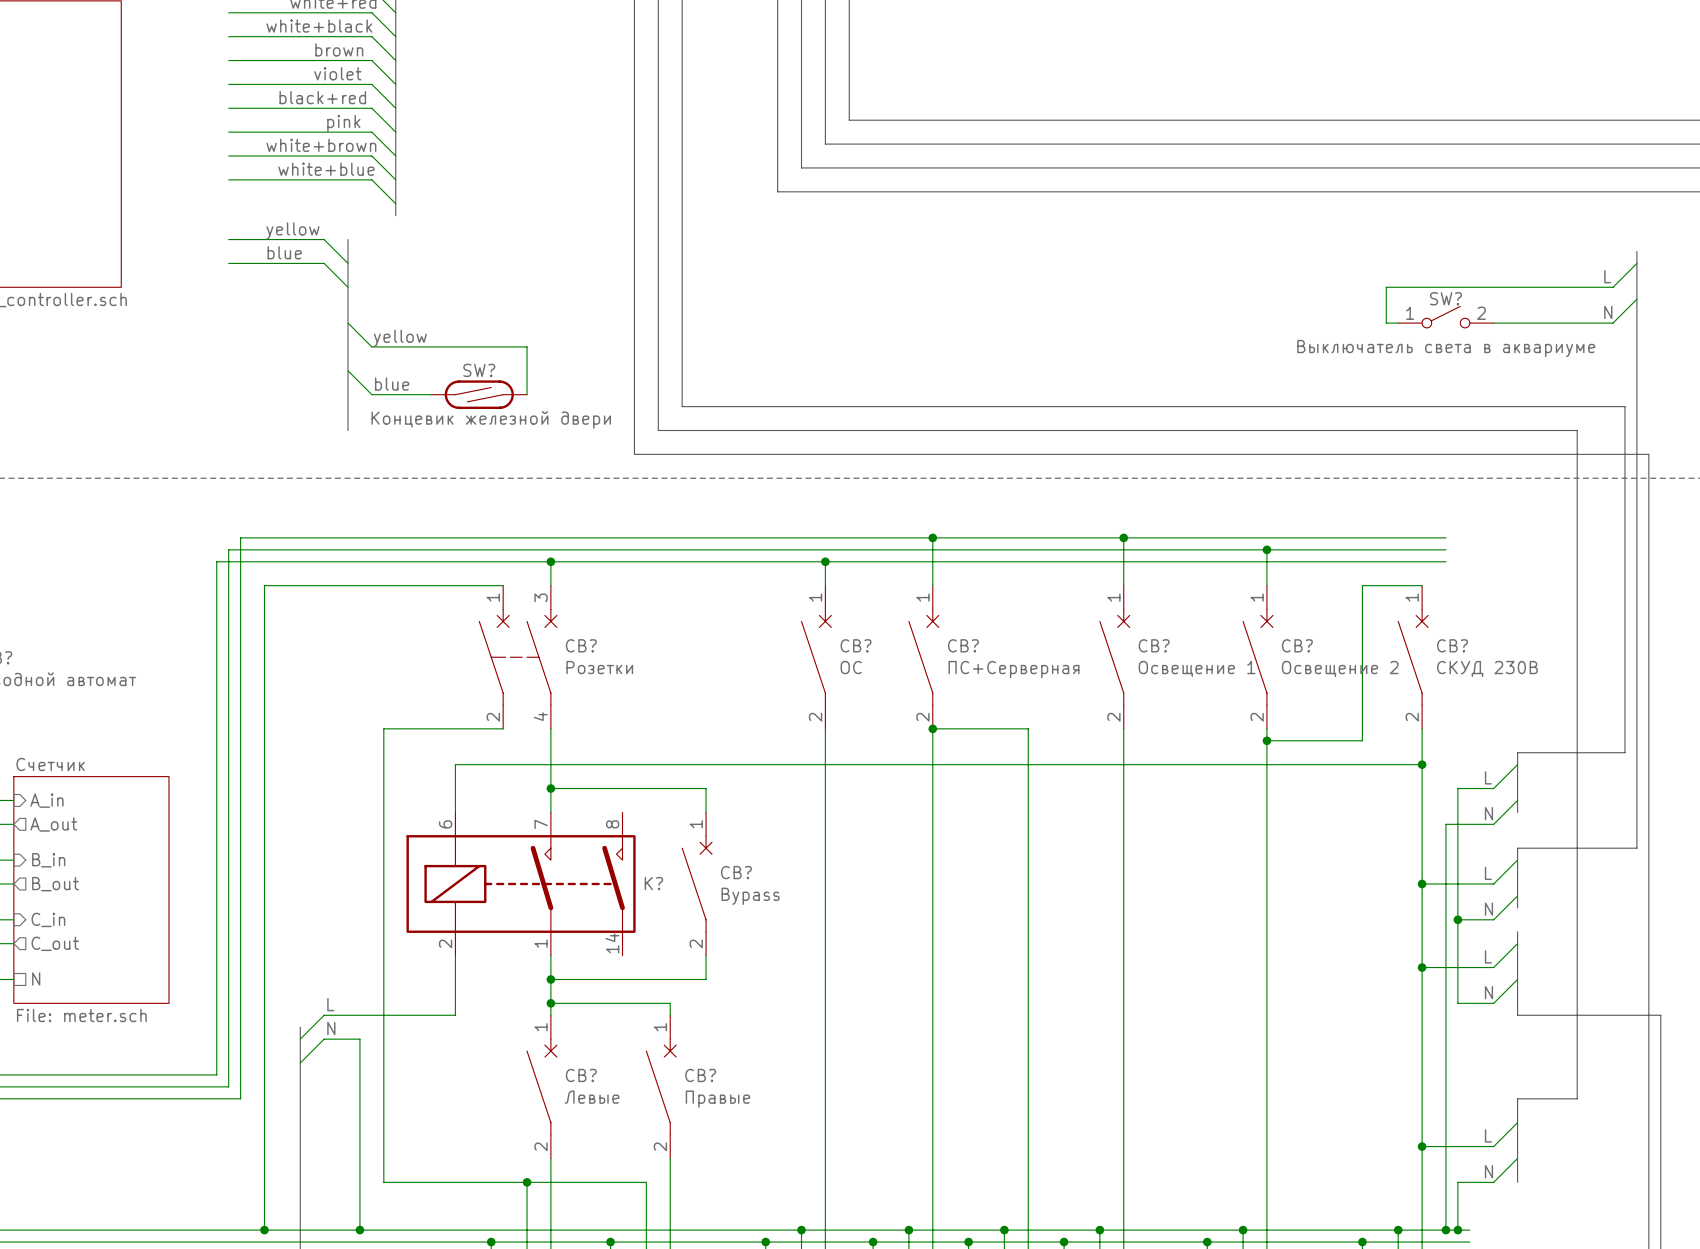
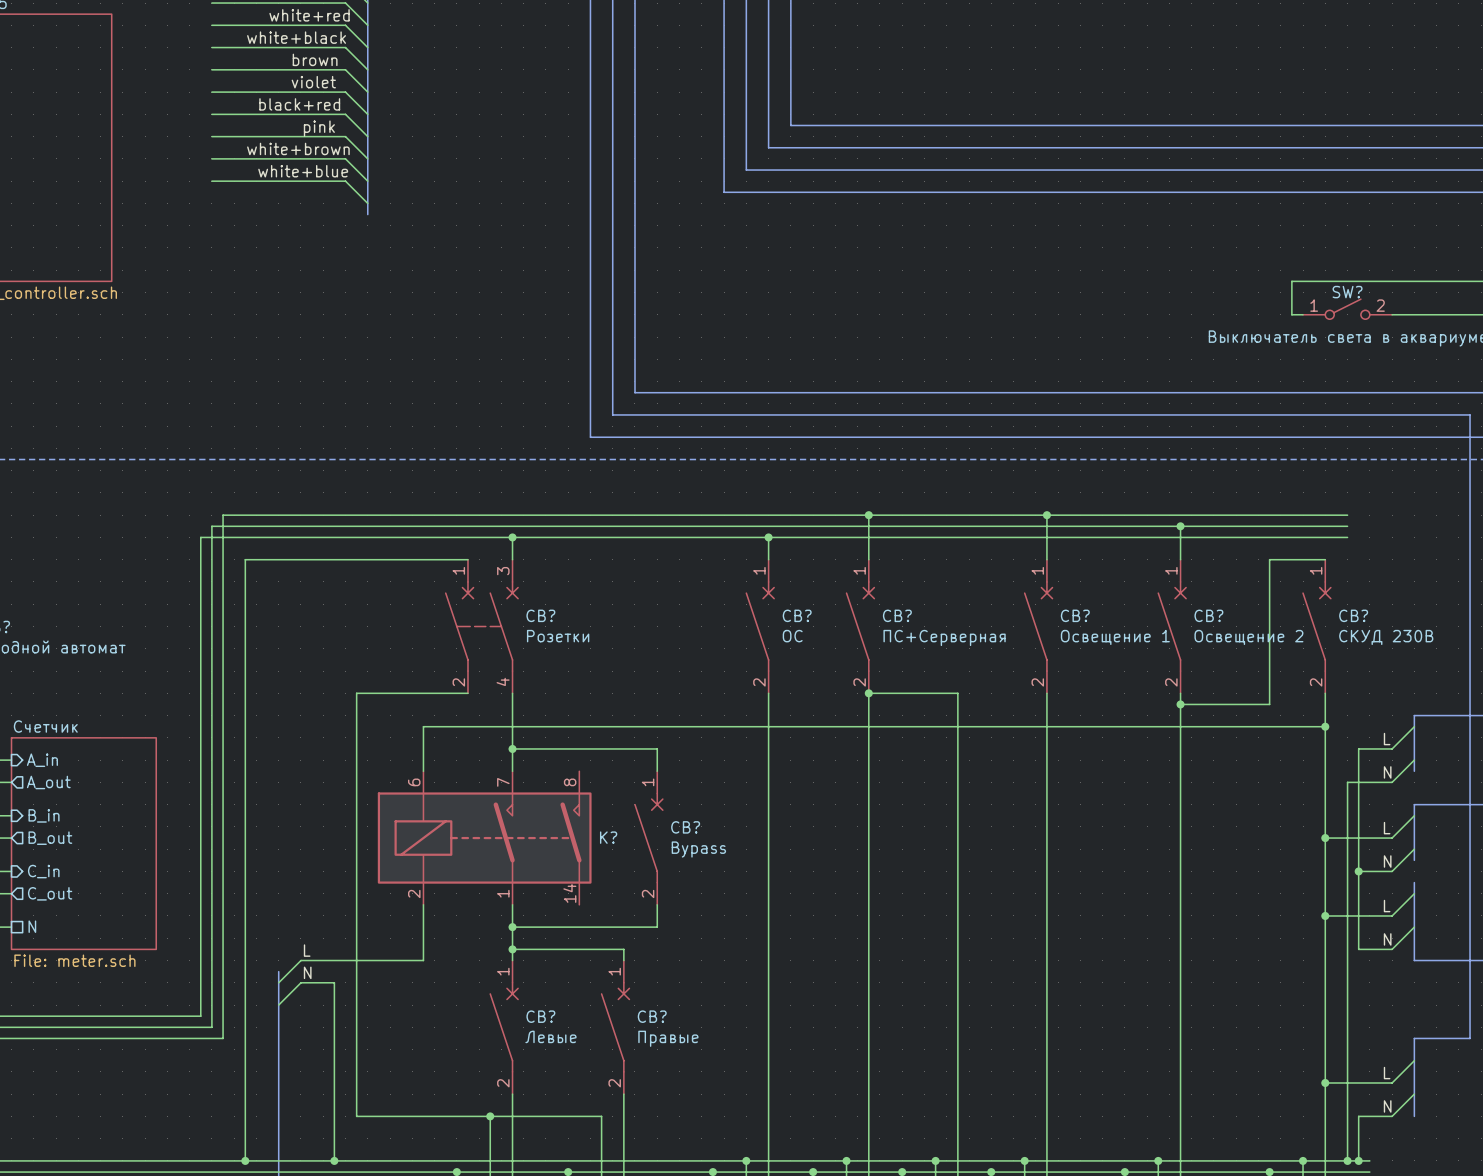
label: yellow (292, 230) -> none
wire: (228, 239) (324, 239) (348, 263) -> none
bus: (348, 239) (348, 430) -> none
label: blue (284, 252) -> none
wire: (228, 263) (324, 263) (348, 287) -> none
wire: (348, 323) (371, 346) (527, 346) (527, 394) -> none
label: yellow (400, 338) -> none
wire: (348, 370) (371, 394) (431, 394) -> none
label: blue (392, 384) -> none
SW?: Концевик железной двери (479, 394) -> none

